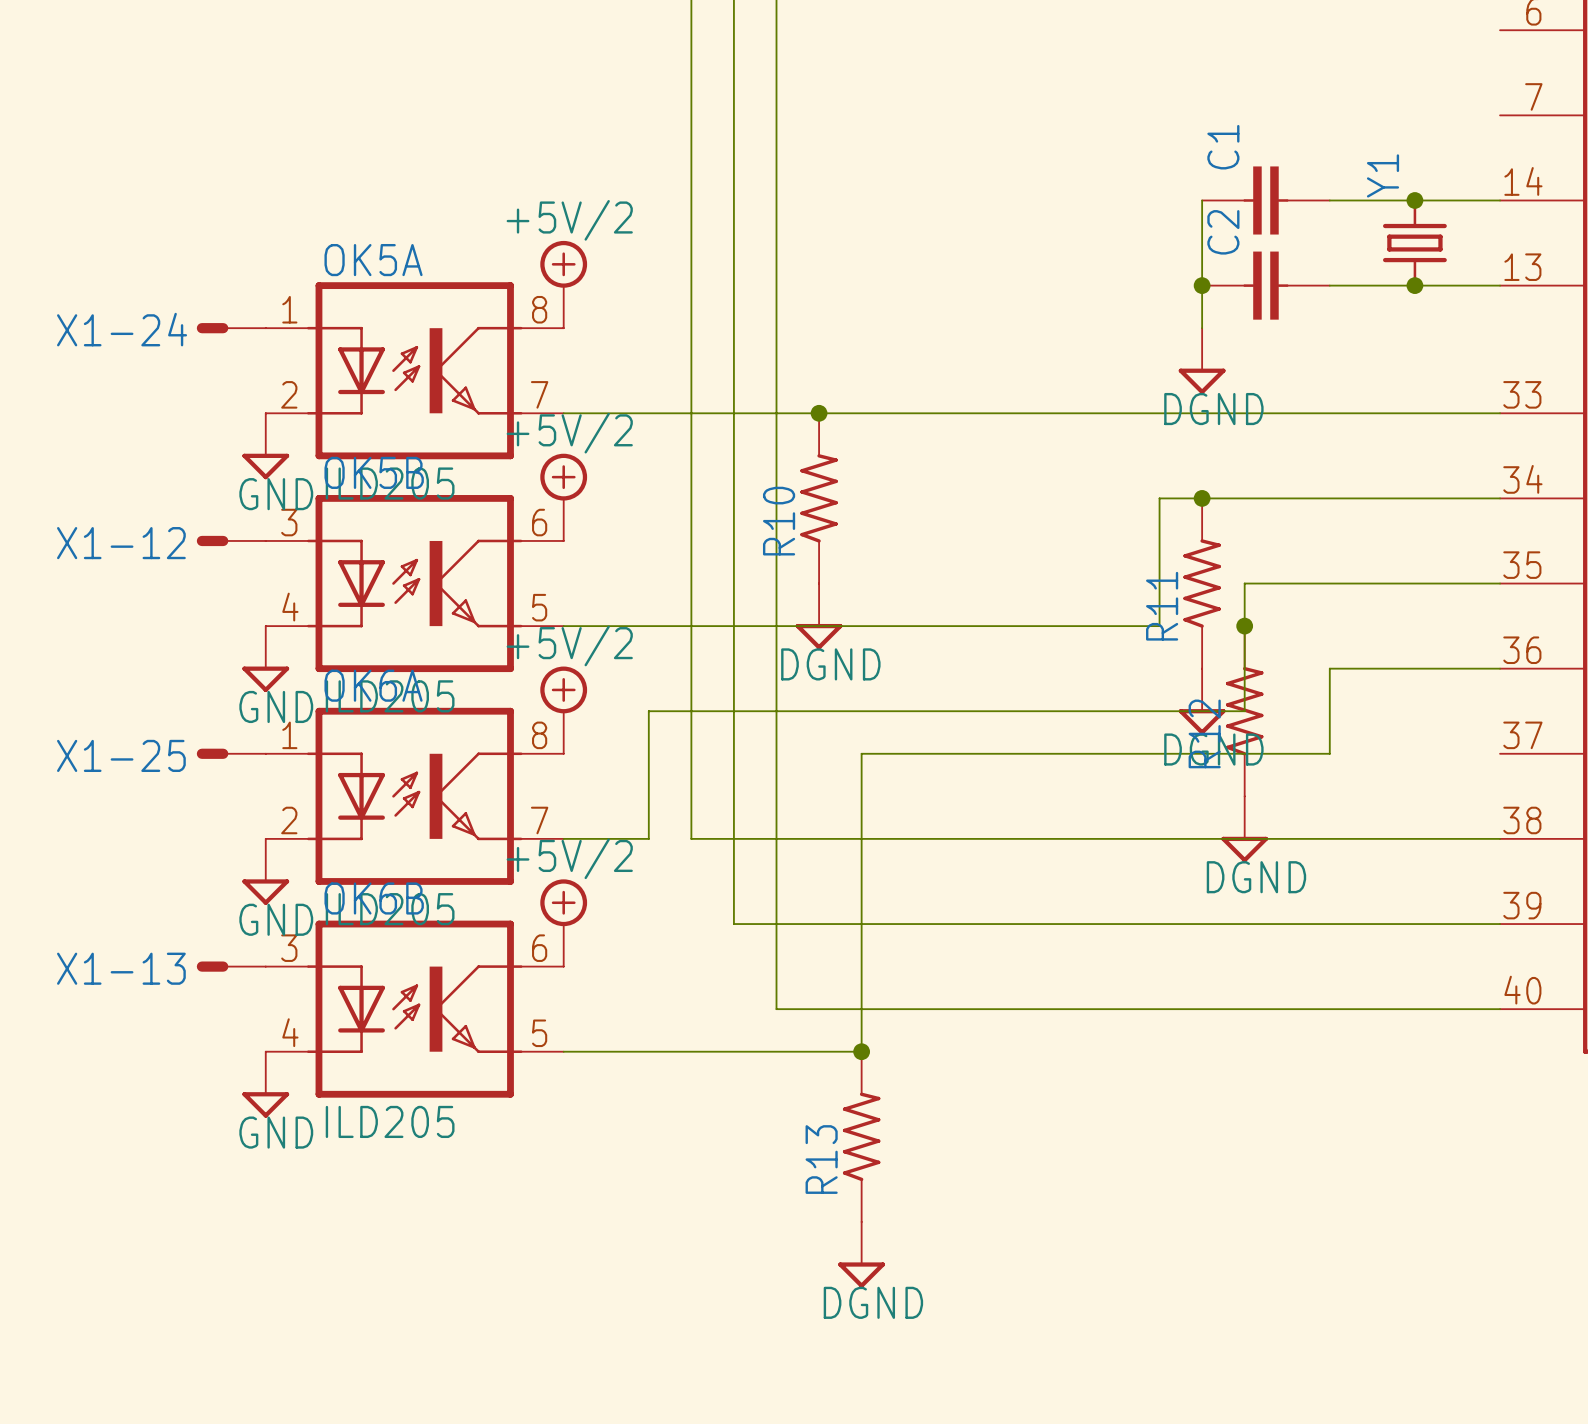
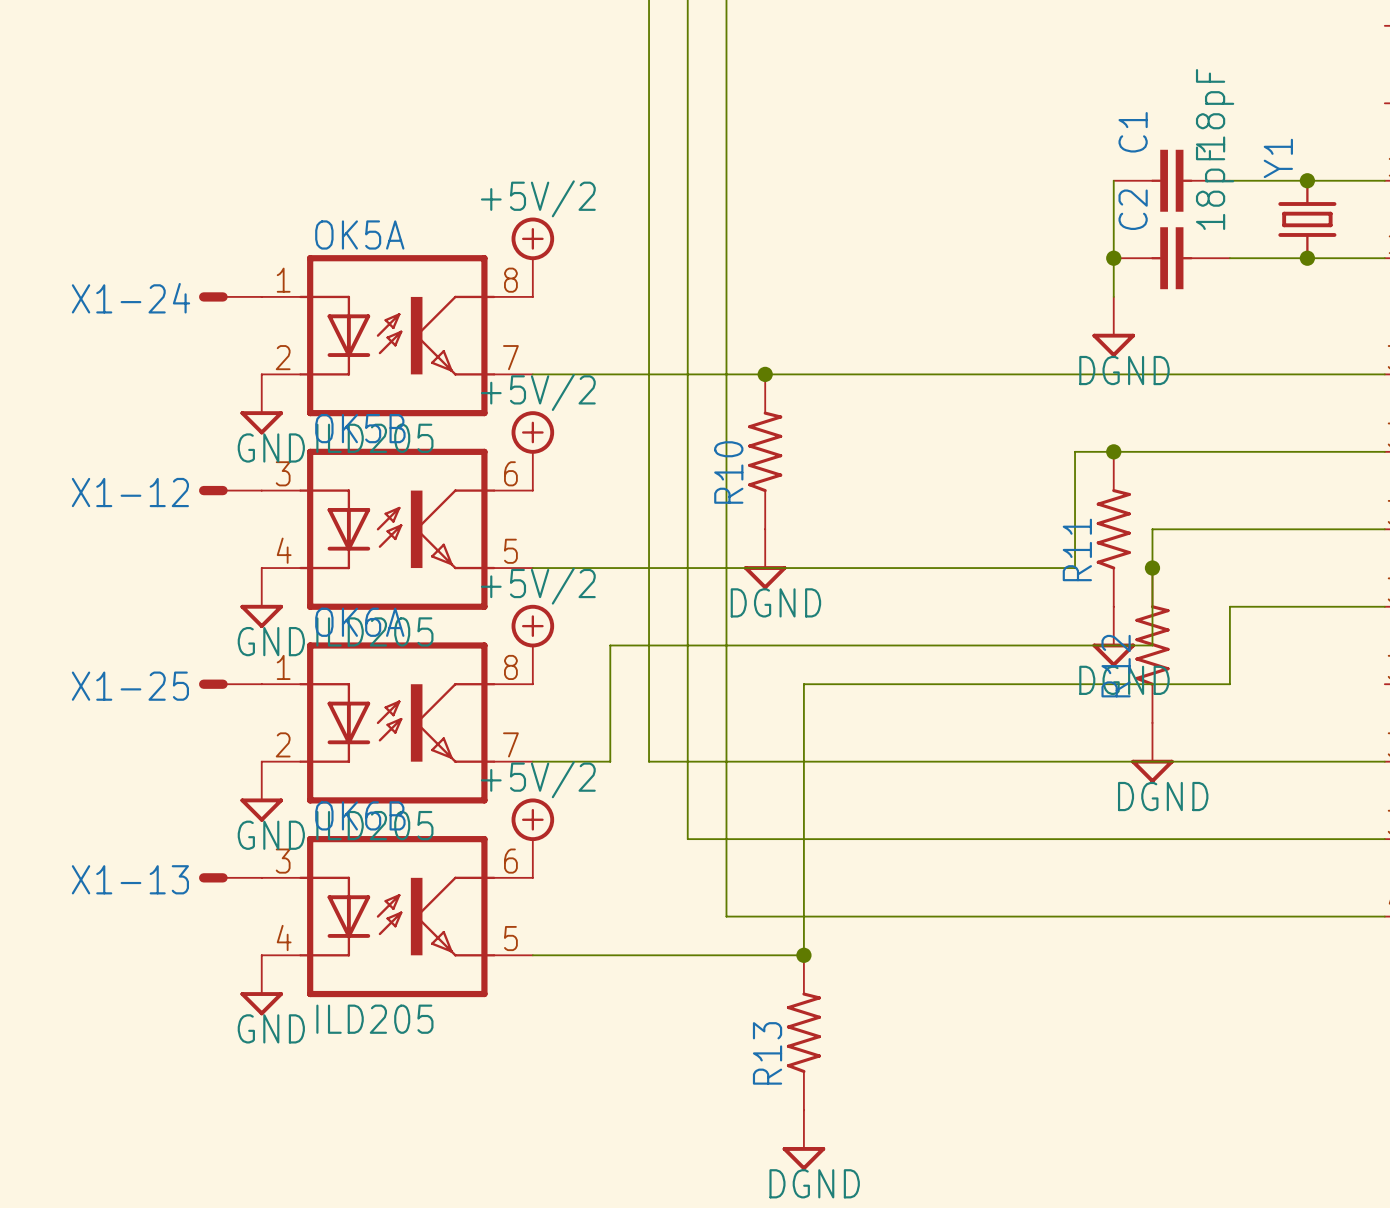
C1 value: none -> 18pF (1215, 110)
C2 value: none -> 18pF (1215, 188)

